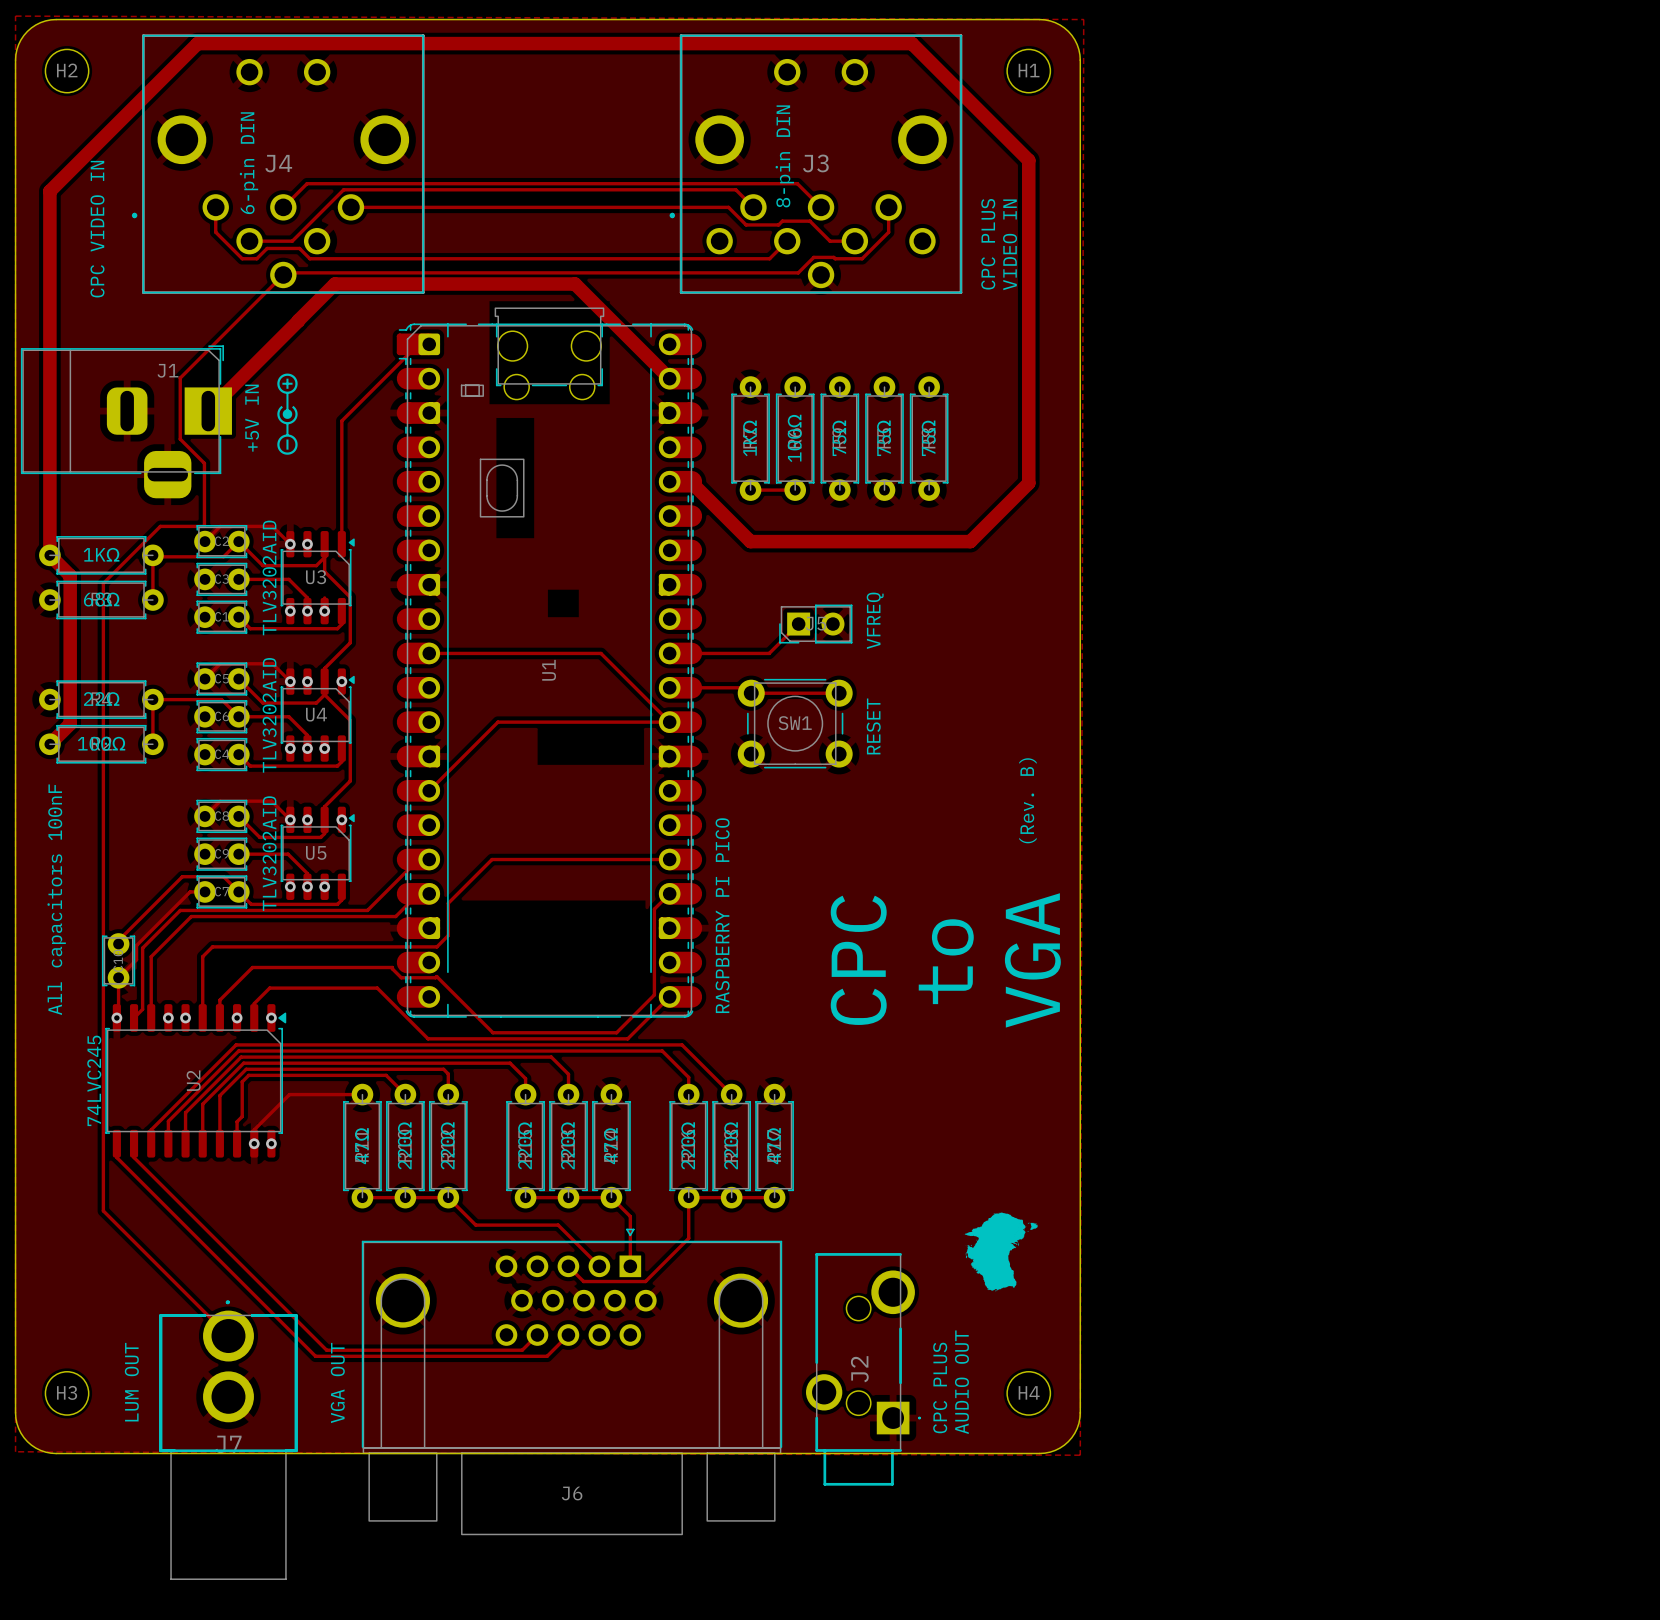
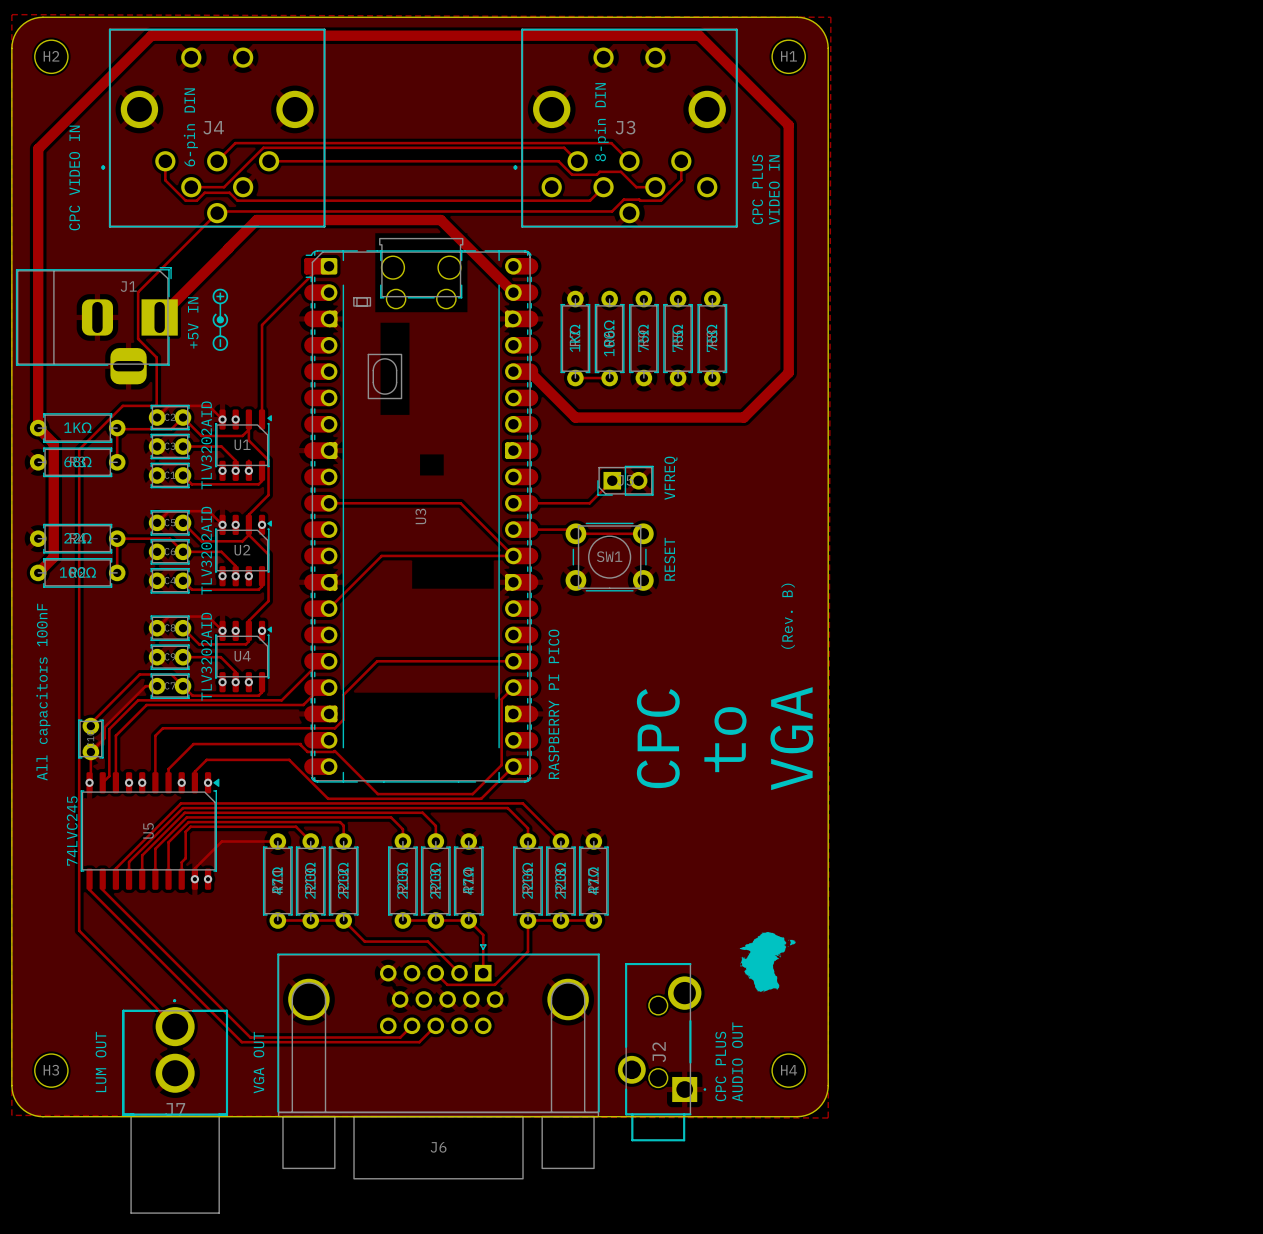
U3 name: U3 (316, 577) -> U1 (242, 444)
U1 name: U1 (549, 670) -> U3 (420, 516)
U4 name: U4 (316, 714) -> U2 (242, 550)
U5 name: U5 (316, 852) -> U4 (242, 656)
U2 name: U2 (193, 1080) -> U5 (148, 830)

